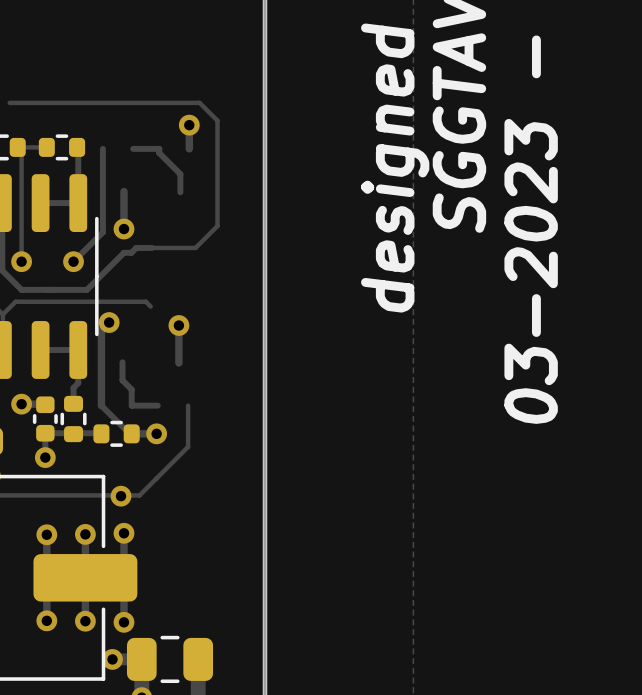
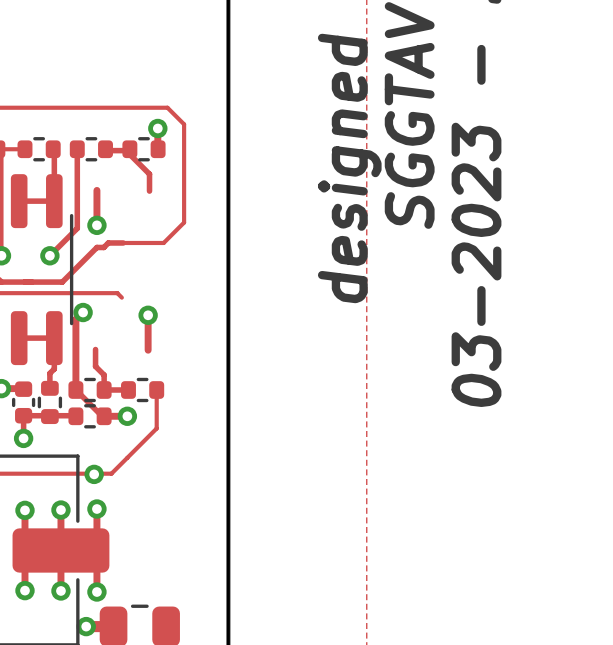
part: none -> (91, 149)
part: none -> (143, 149)
part: none -> (90, 389)
part: none -> (142, 389)

